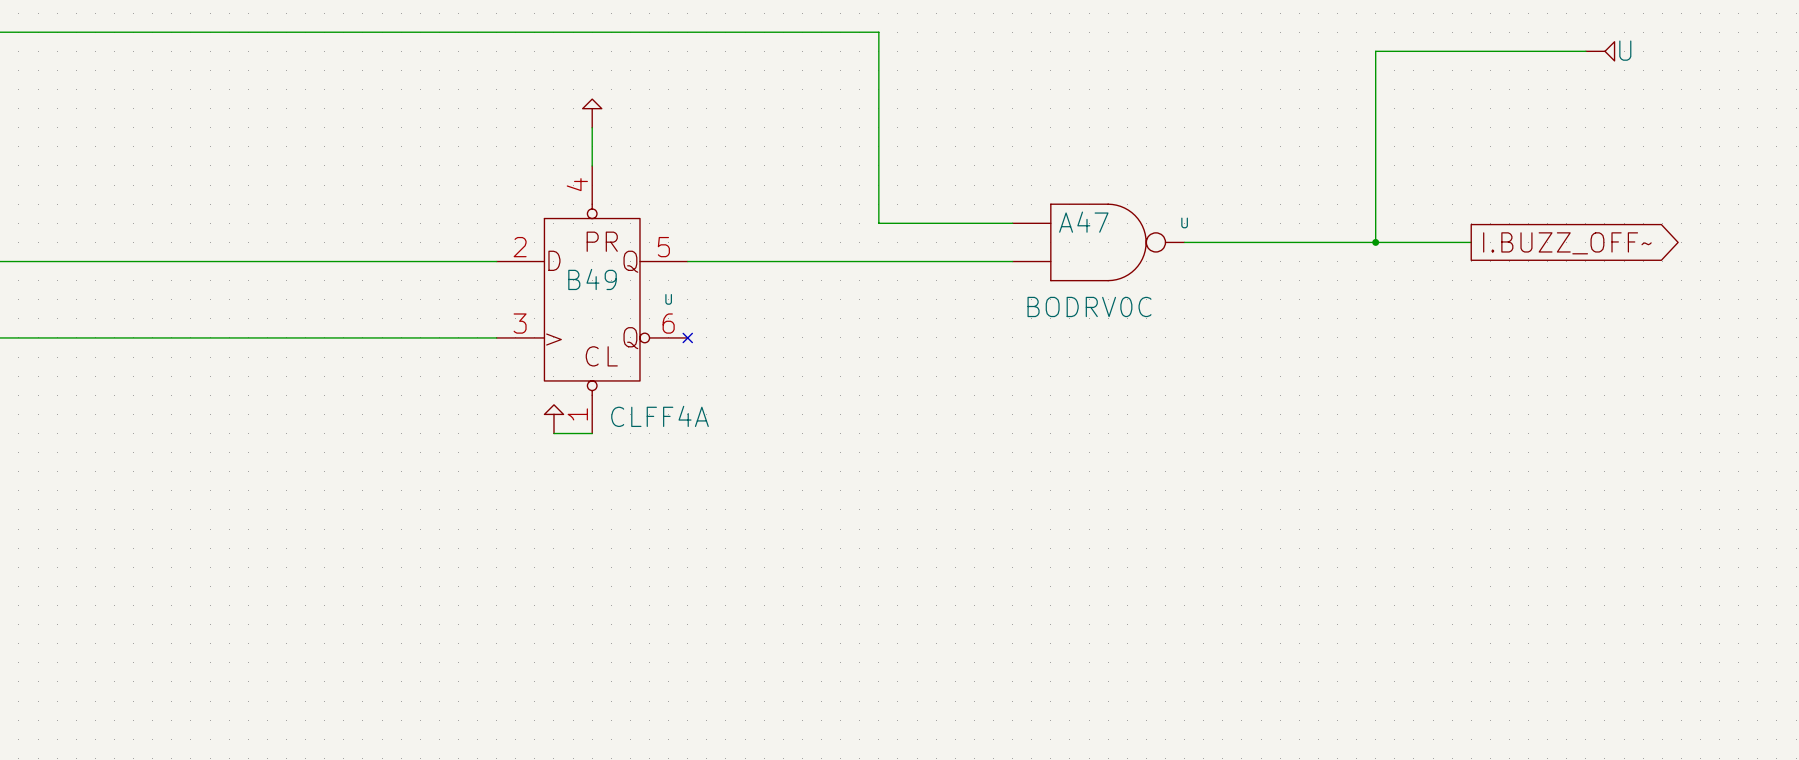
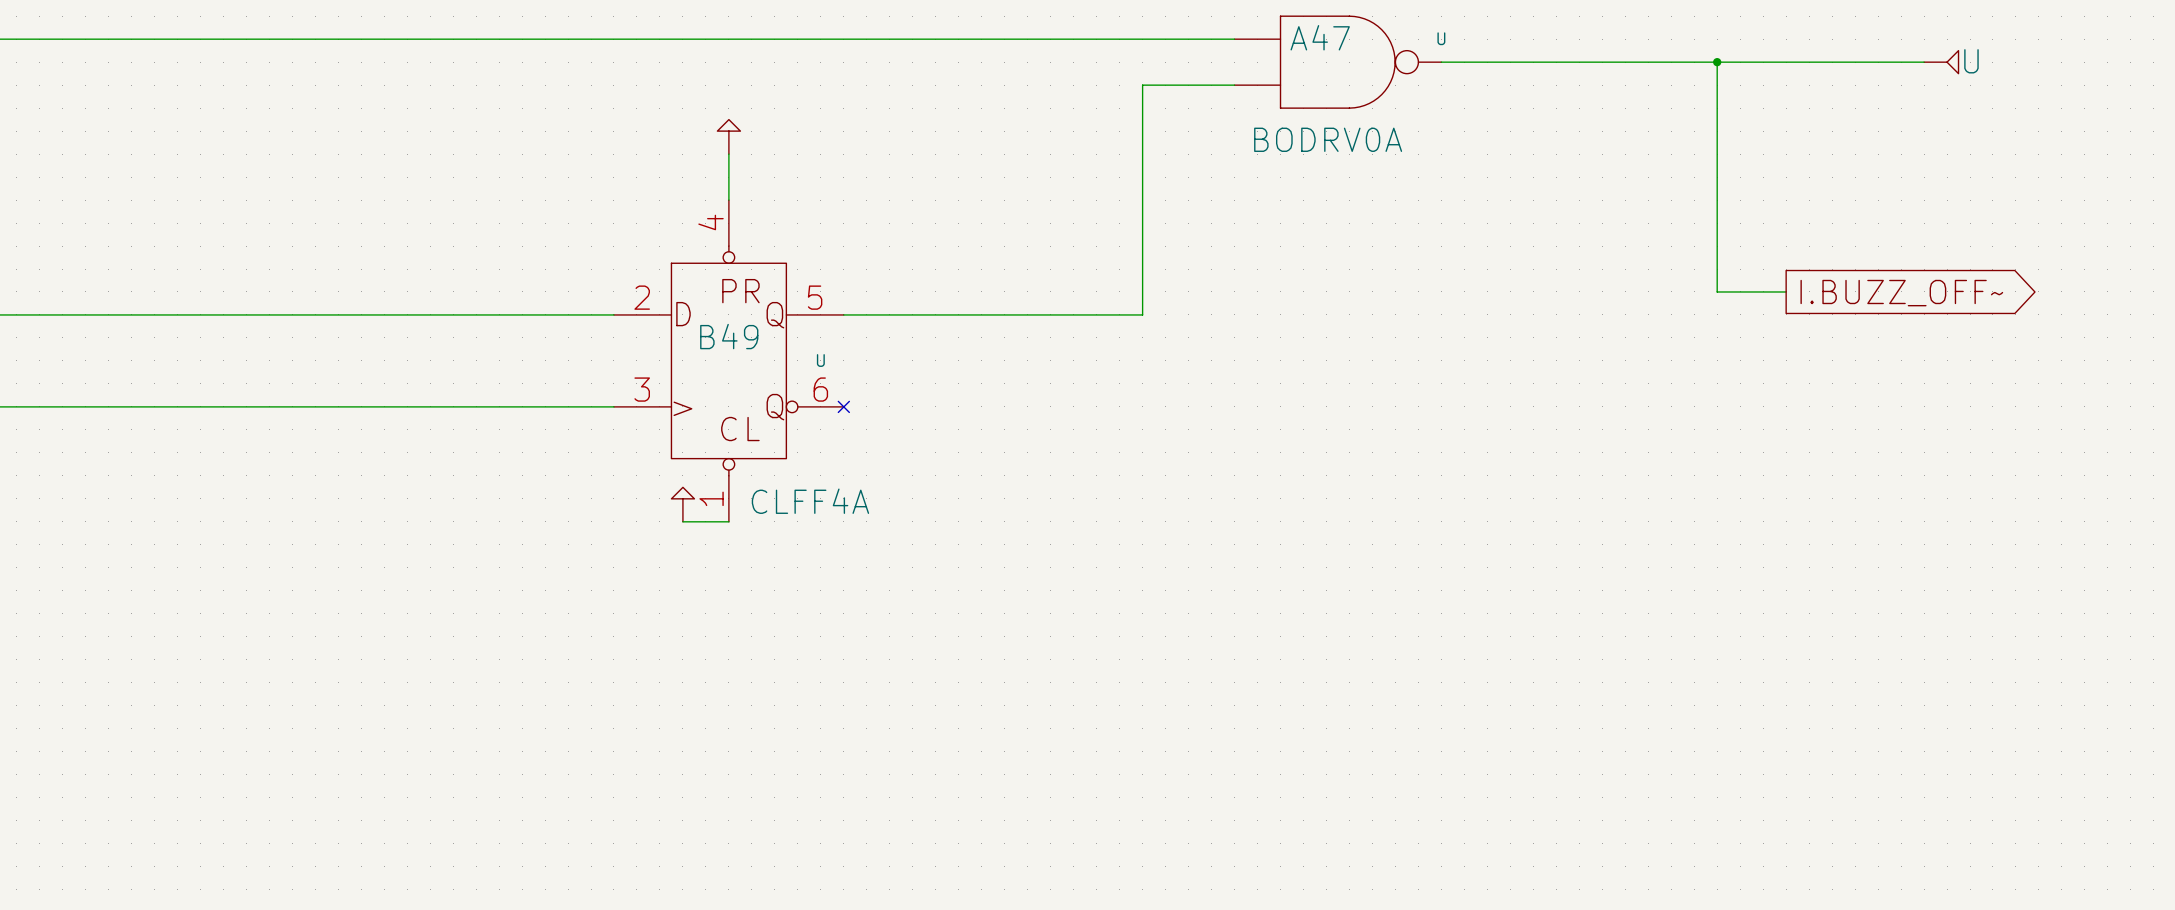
wire: (878, 32) (878, 223) (1012, 223) -> (1073, 39) (1234, 39)
U: none -> (1337, 62)
wire: (1375, 51) (1375, 242) -> (1671, 62) (1441, 62)
junction: none -> (1717, 62)
U: (1098, 242) -> none
wire: (1184, 242) (1413, 242) -> (1717, 62) (1717, 291)
junction: (1375, 242) -> none
wire: (936, 261) (1012, 261) -> (1142, 314) (1142, 85) (1234, 85)

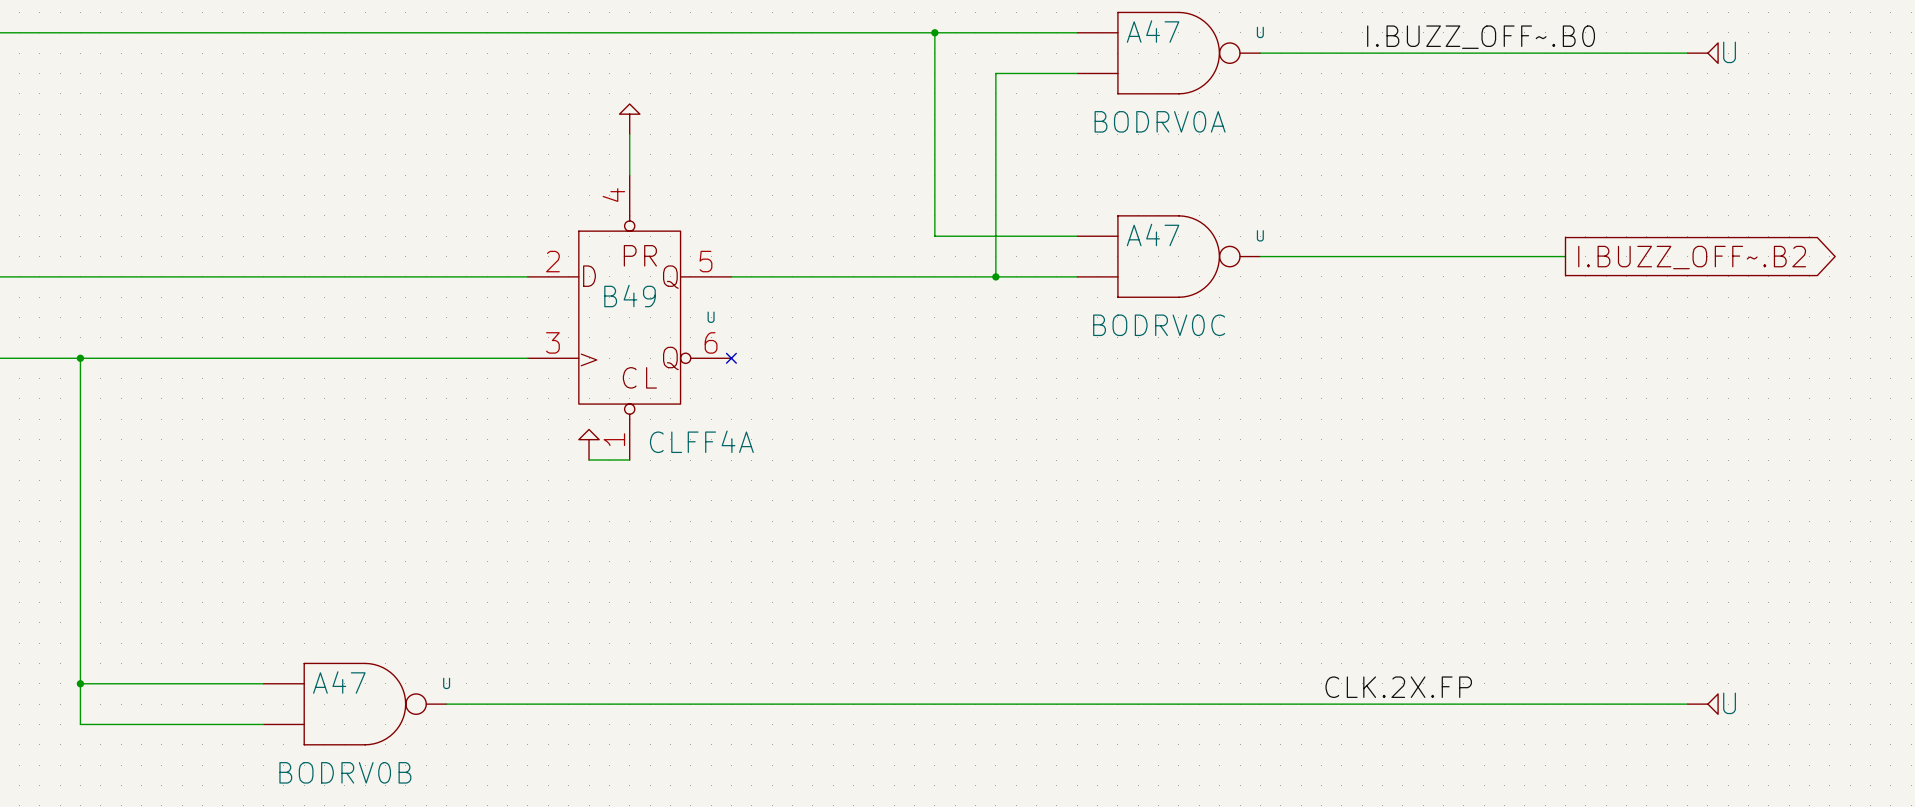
wire: none -> (934, 32) (934, 236) (1077, 236)
junction: none -> (934, 32)
label: none -> I.BUZZ_OFF~.B0 (1481, 37)
wire: (1717, 62) (1717, 291) -> (1260, 256) (1504, 256)
junction: (1717, 62) -> none
U: none -> (1168, 256)
global label: I.BUZZ_OFF~ (1901, 293) -> I.BUZZ_OFF~.B2 (1692, 257)
wire: none -> (995, 276) (1077, 276)
junction: none -> (995, 276)
wire: none -> (80, 358) (80, 724) (263, 724)
junction: none -> (80, 358)
wire: none -> (80, 683) (263, 683)
junction: none -> (80, 683)
label: none -> CLK.2X.FP (1398, 687)
U: none -> (355, 704)
wire: none -> (446, 704) (1687, 704)
U: none -> (1703, 704)

